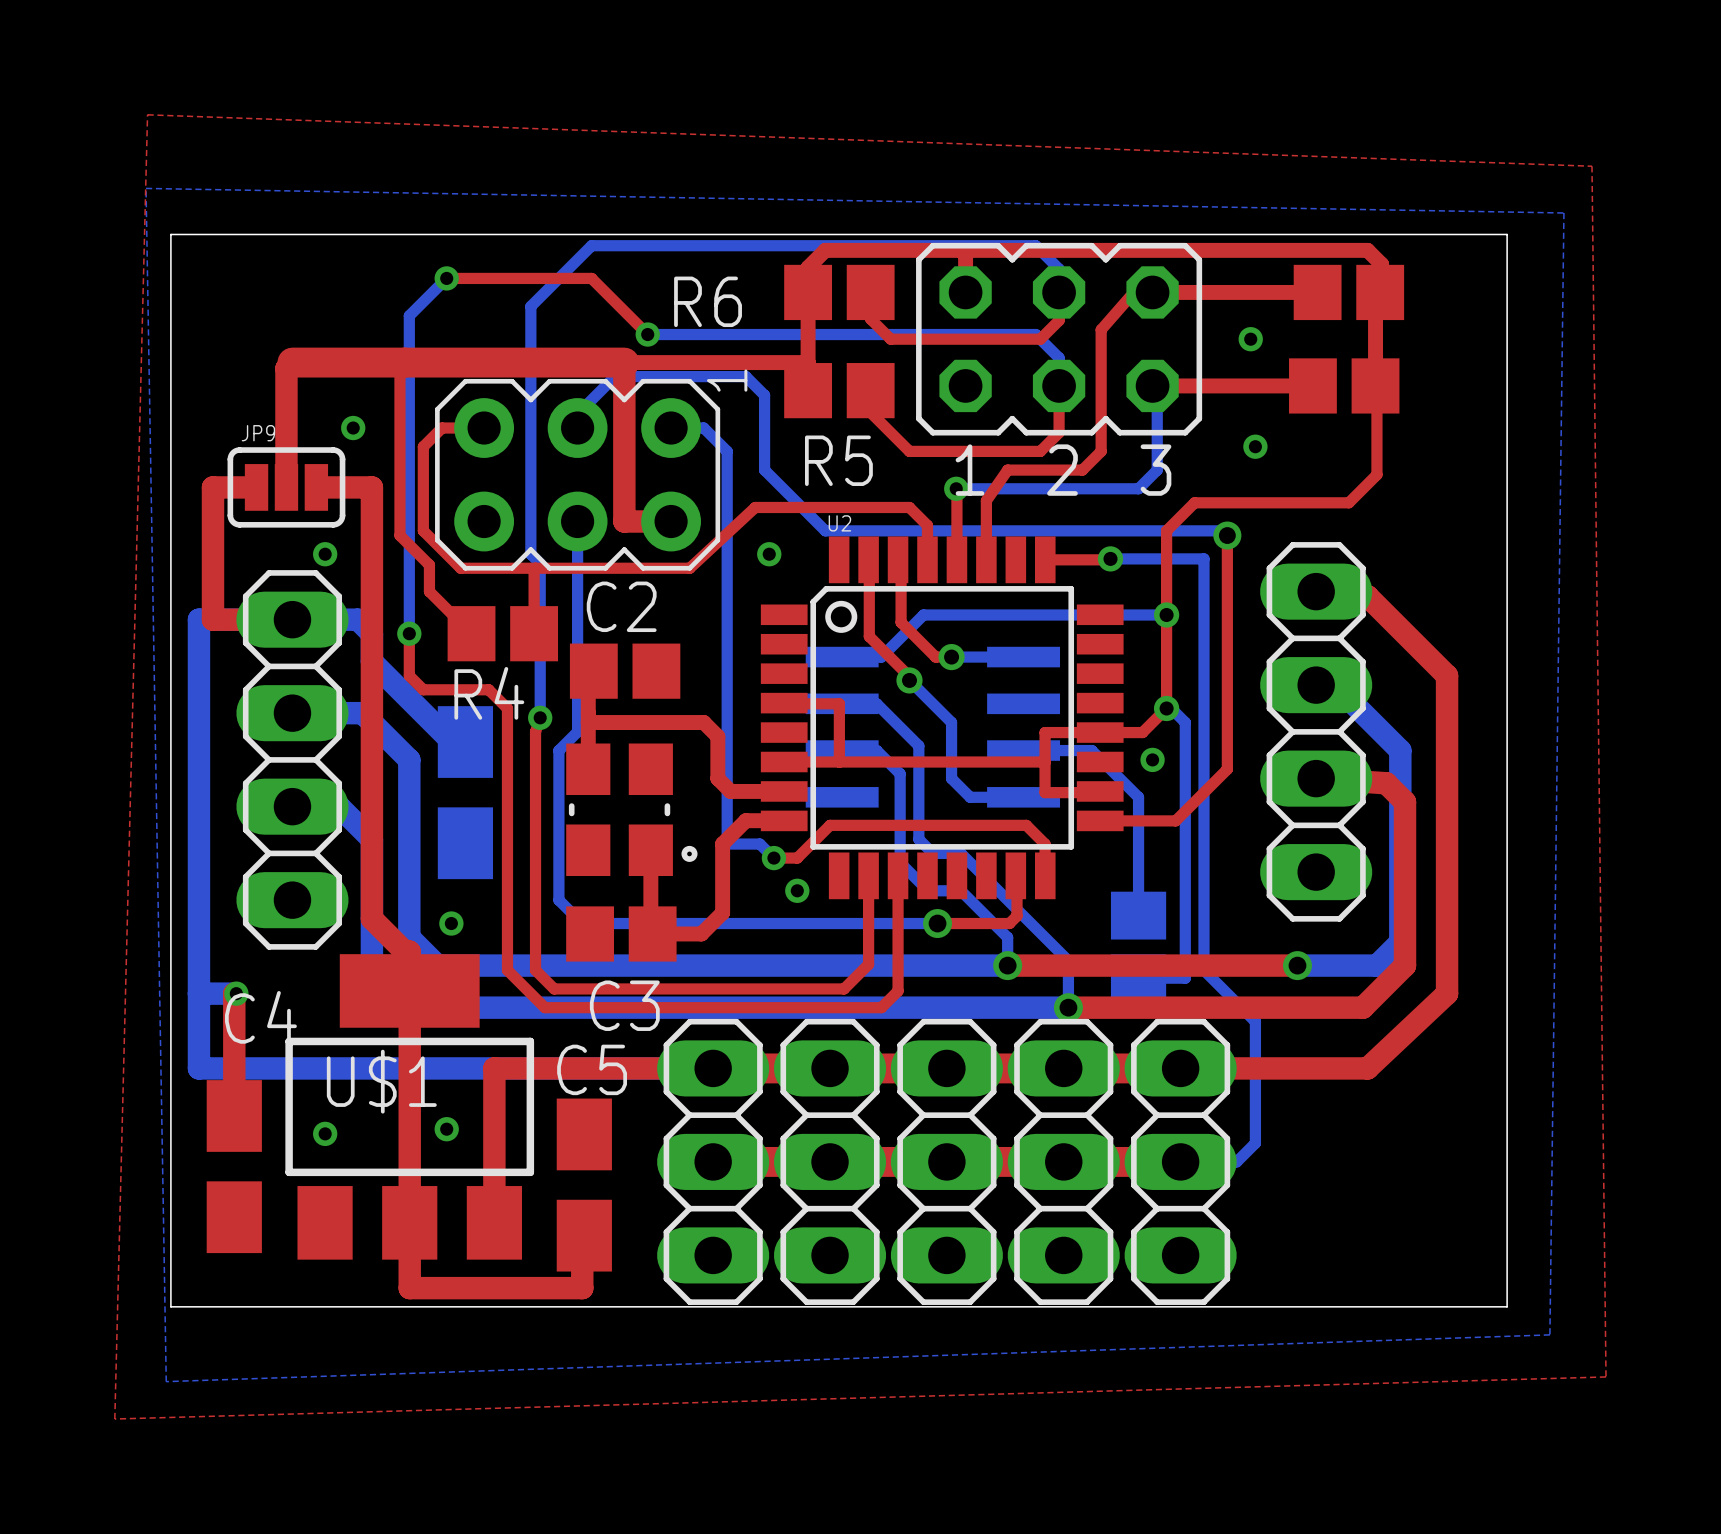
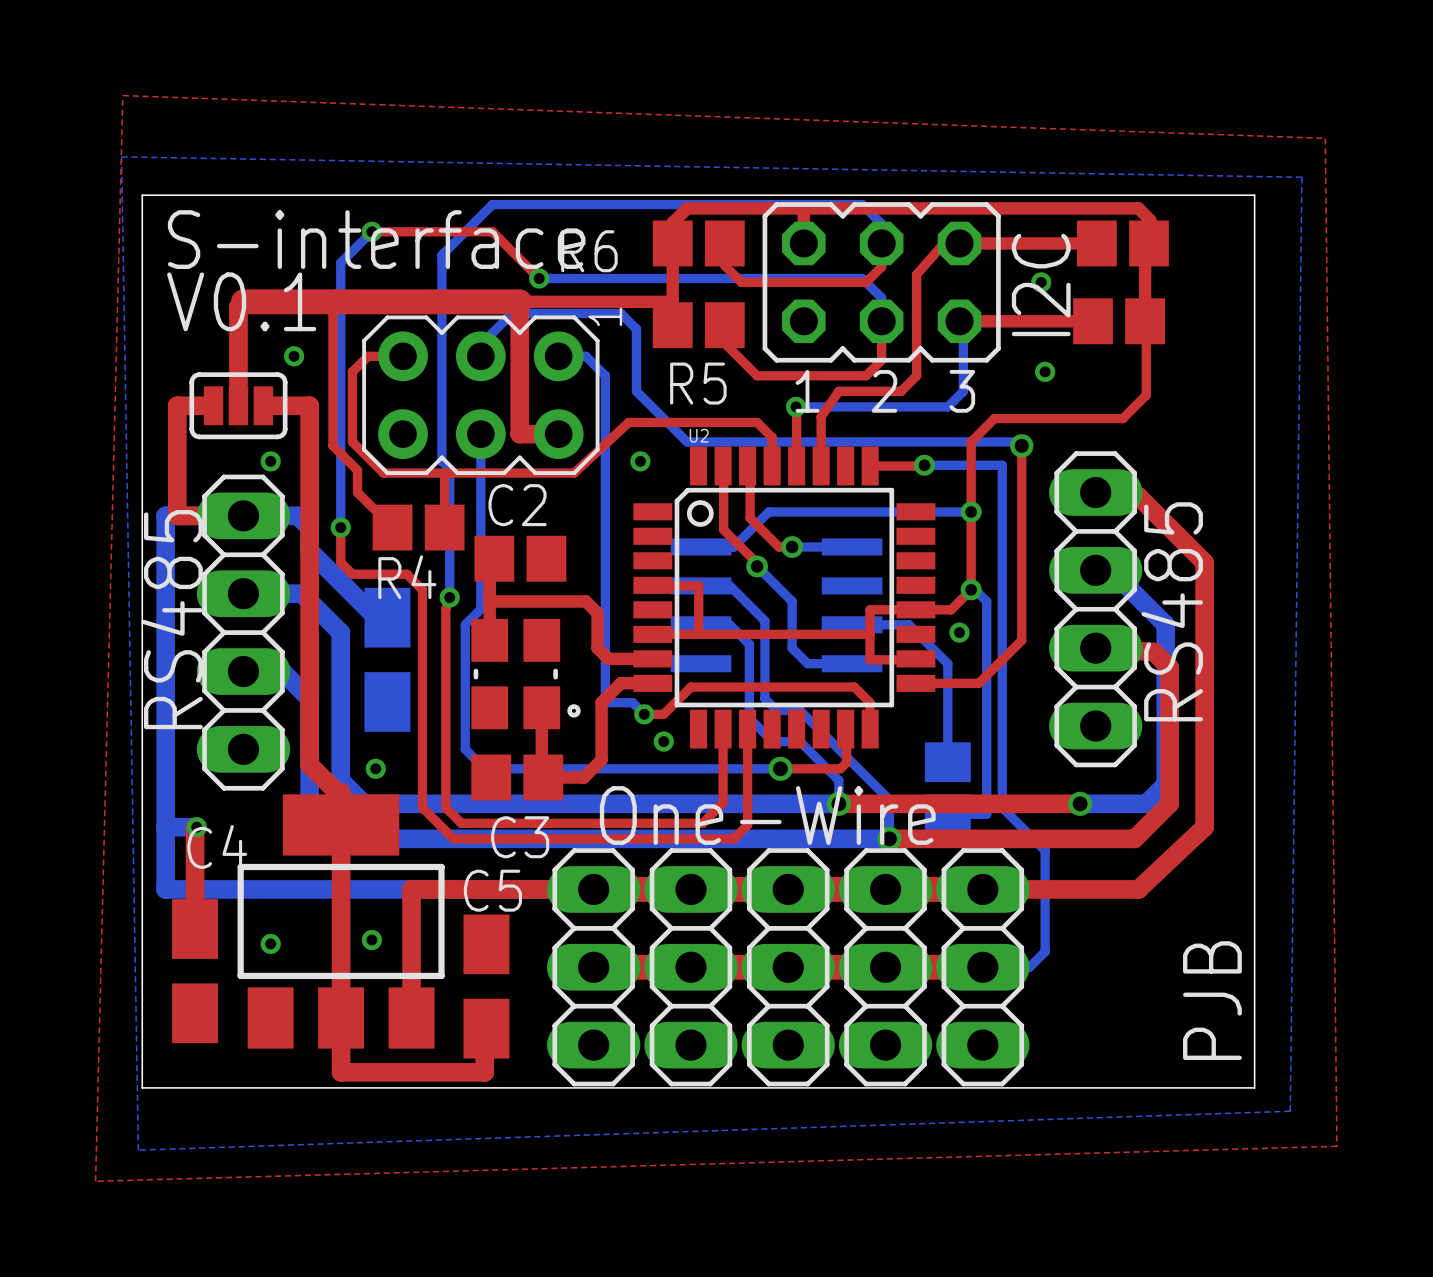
text: none -> S-interface (376, 239)
text: none -> I2C (1041, 284)
text: none -> V0.1 (241, 301)
JP9 name: JP9 (258, 433) -> none
text: none -> RS485 (1172, 611)
text: none -> RS485 (172, 619)
text: none -> One-Wire (767, 815)
U$1 name: U$1 (381, 1081) -> none
text: none -> PJB (1212, 1000)

